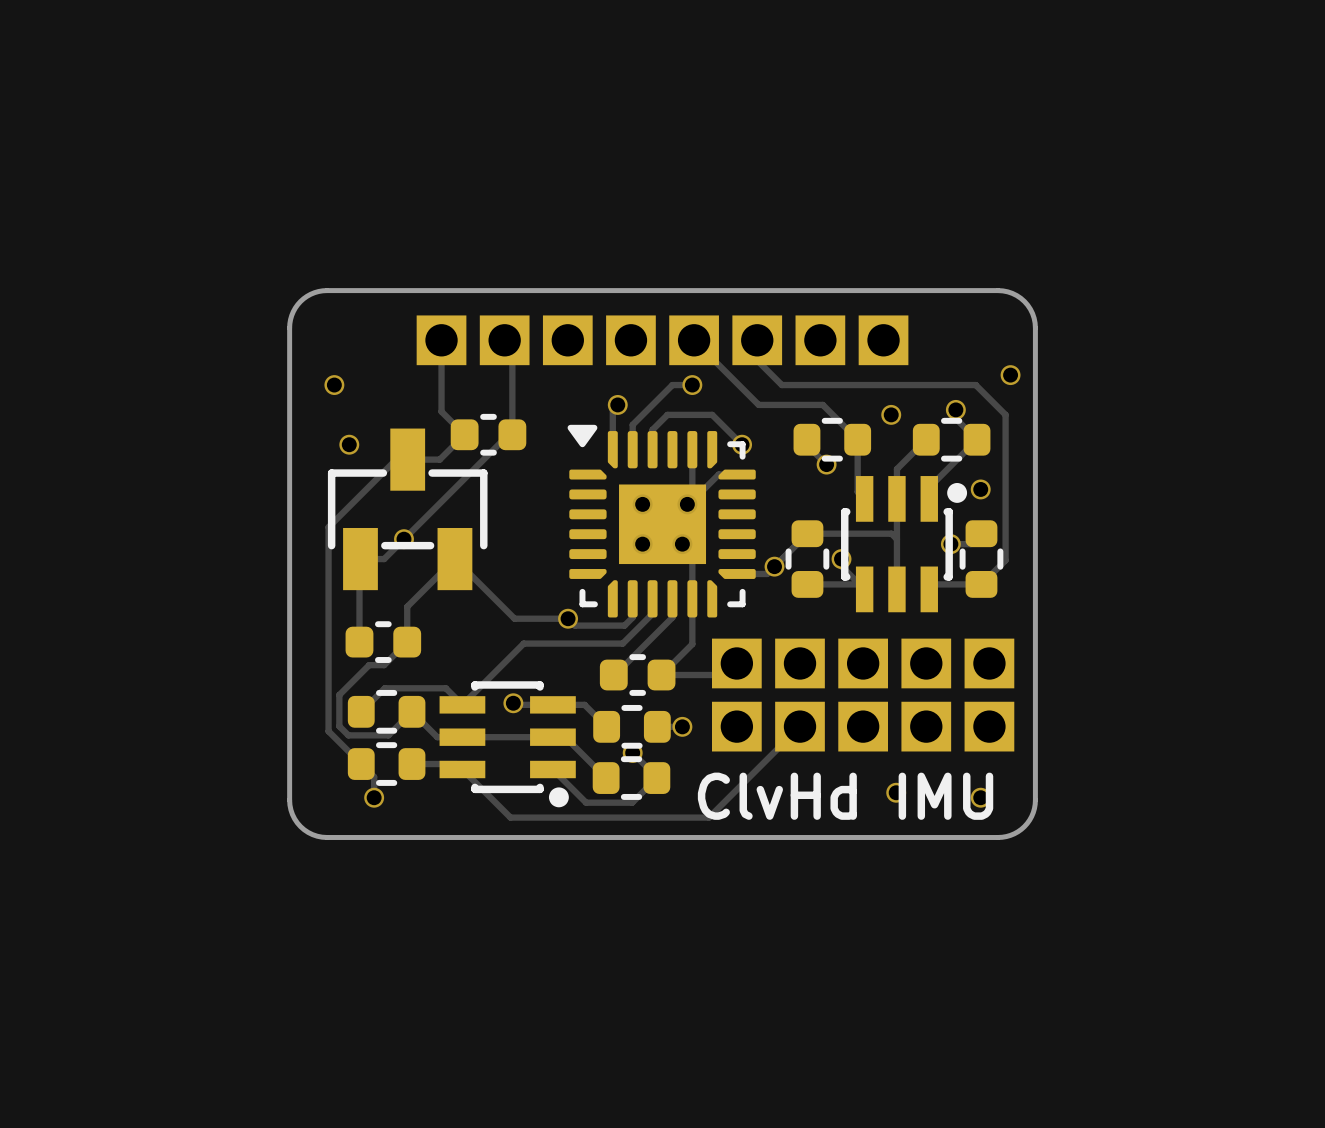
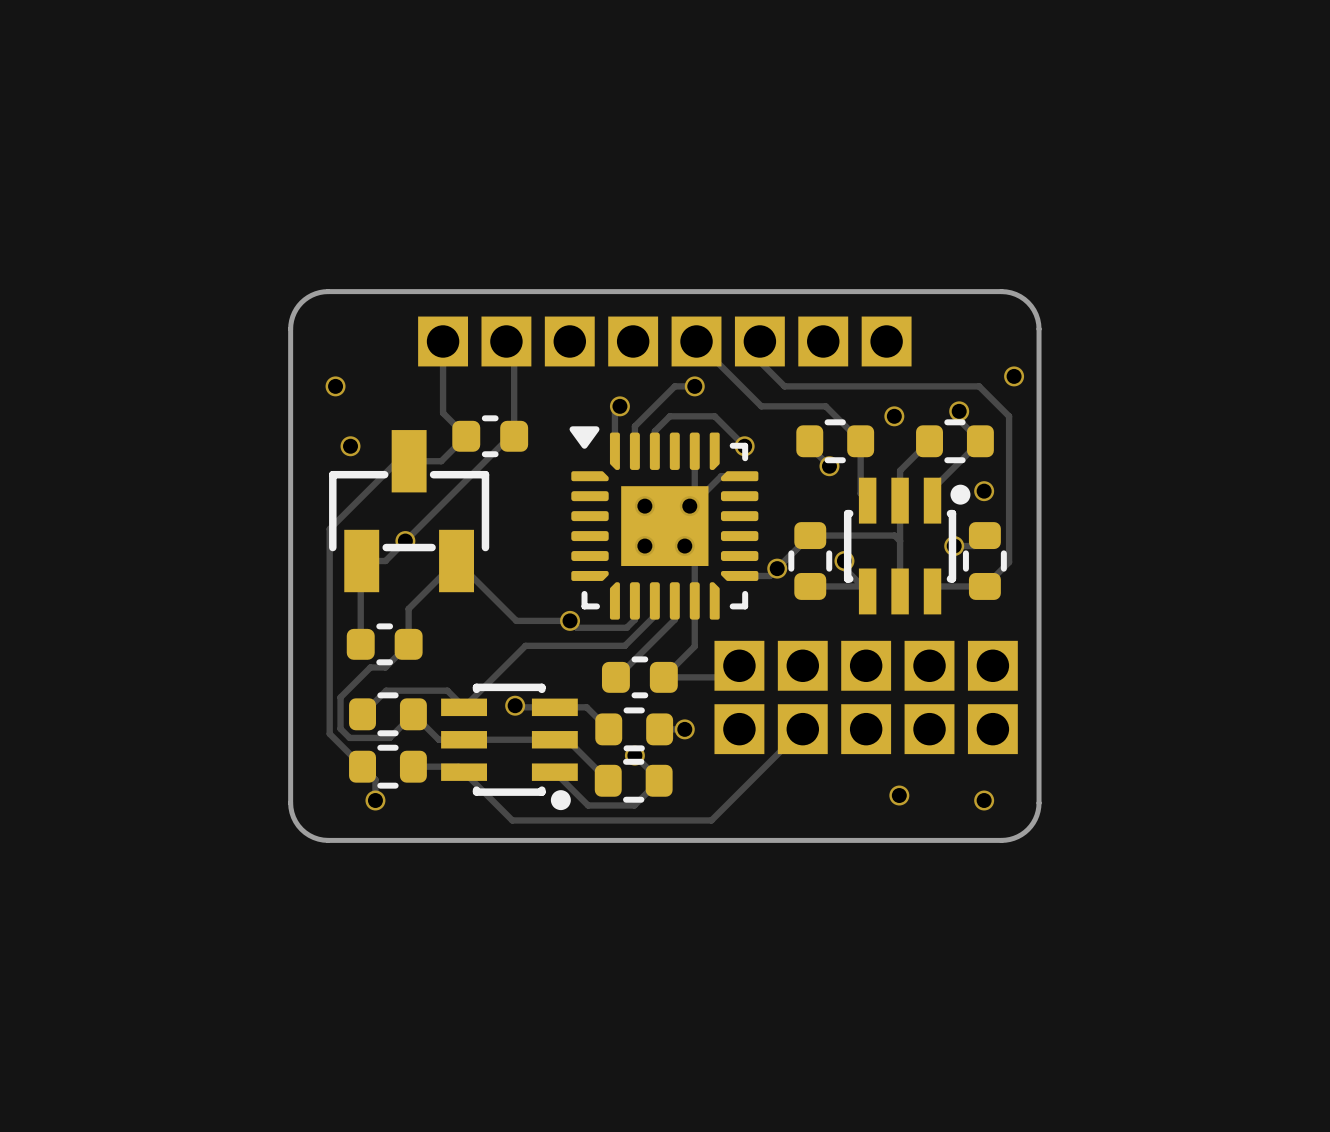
text: ClvHd IMU (845, 796) -> none

